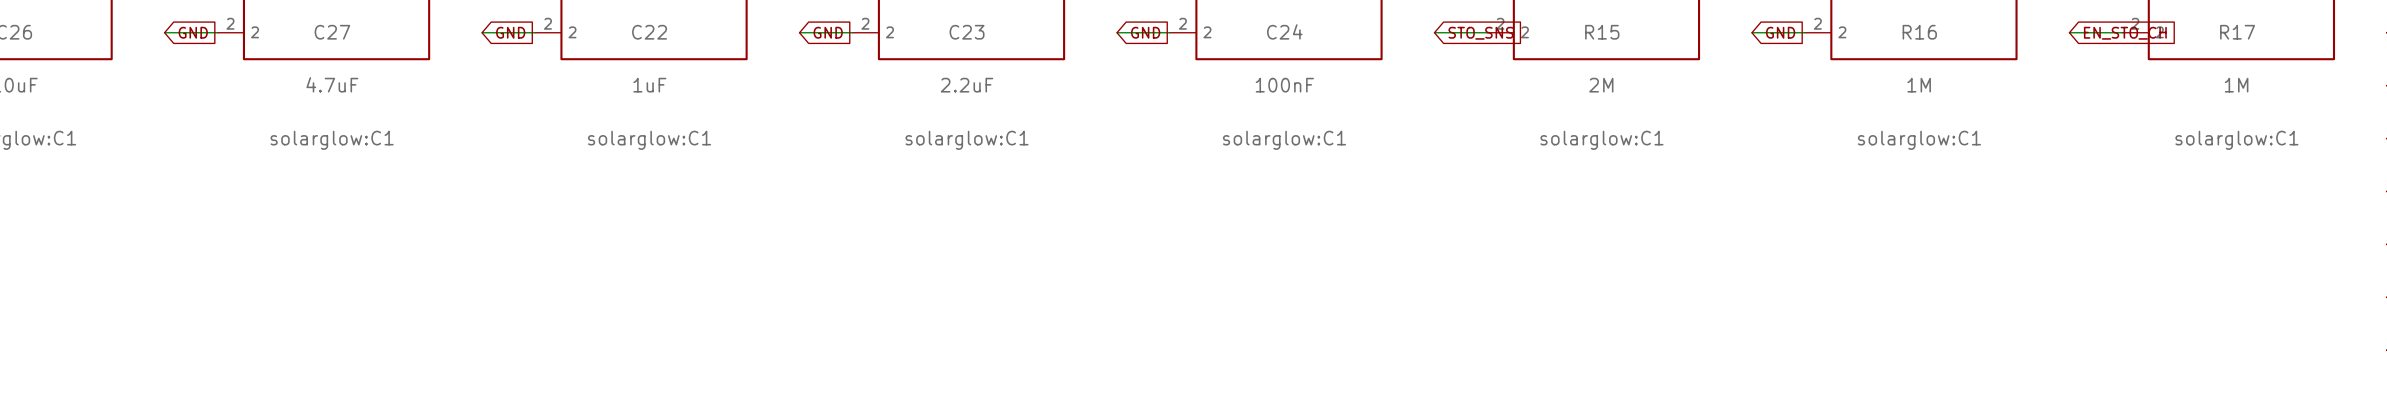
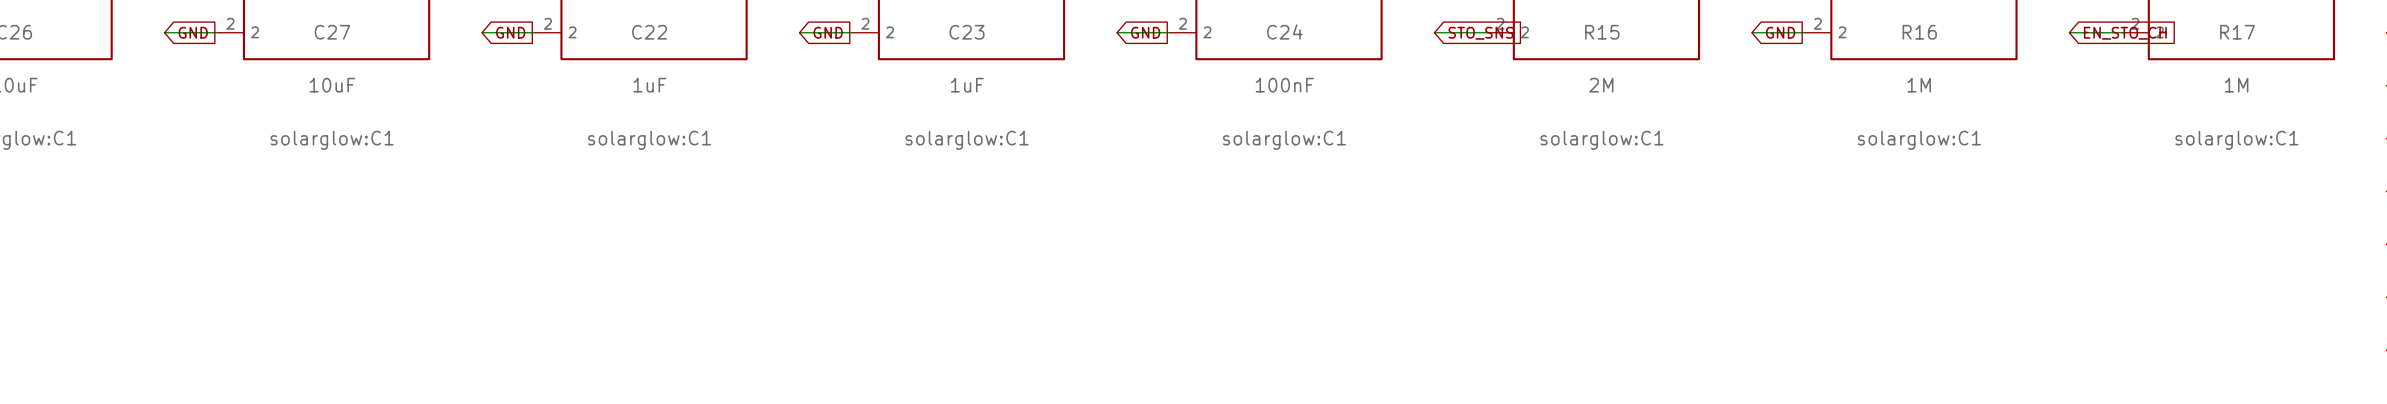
C27 value: 4.7uF (332, 84) -> 10uF (332, 85)
C23 value: 2.2uF (967, 85) -> 1uF (967, 85)

